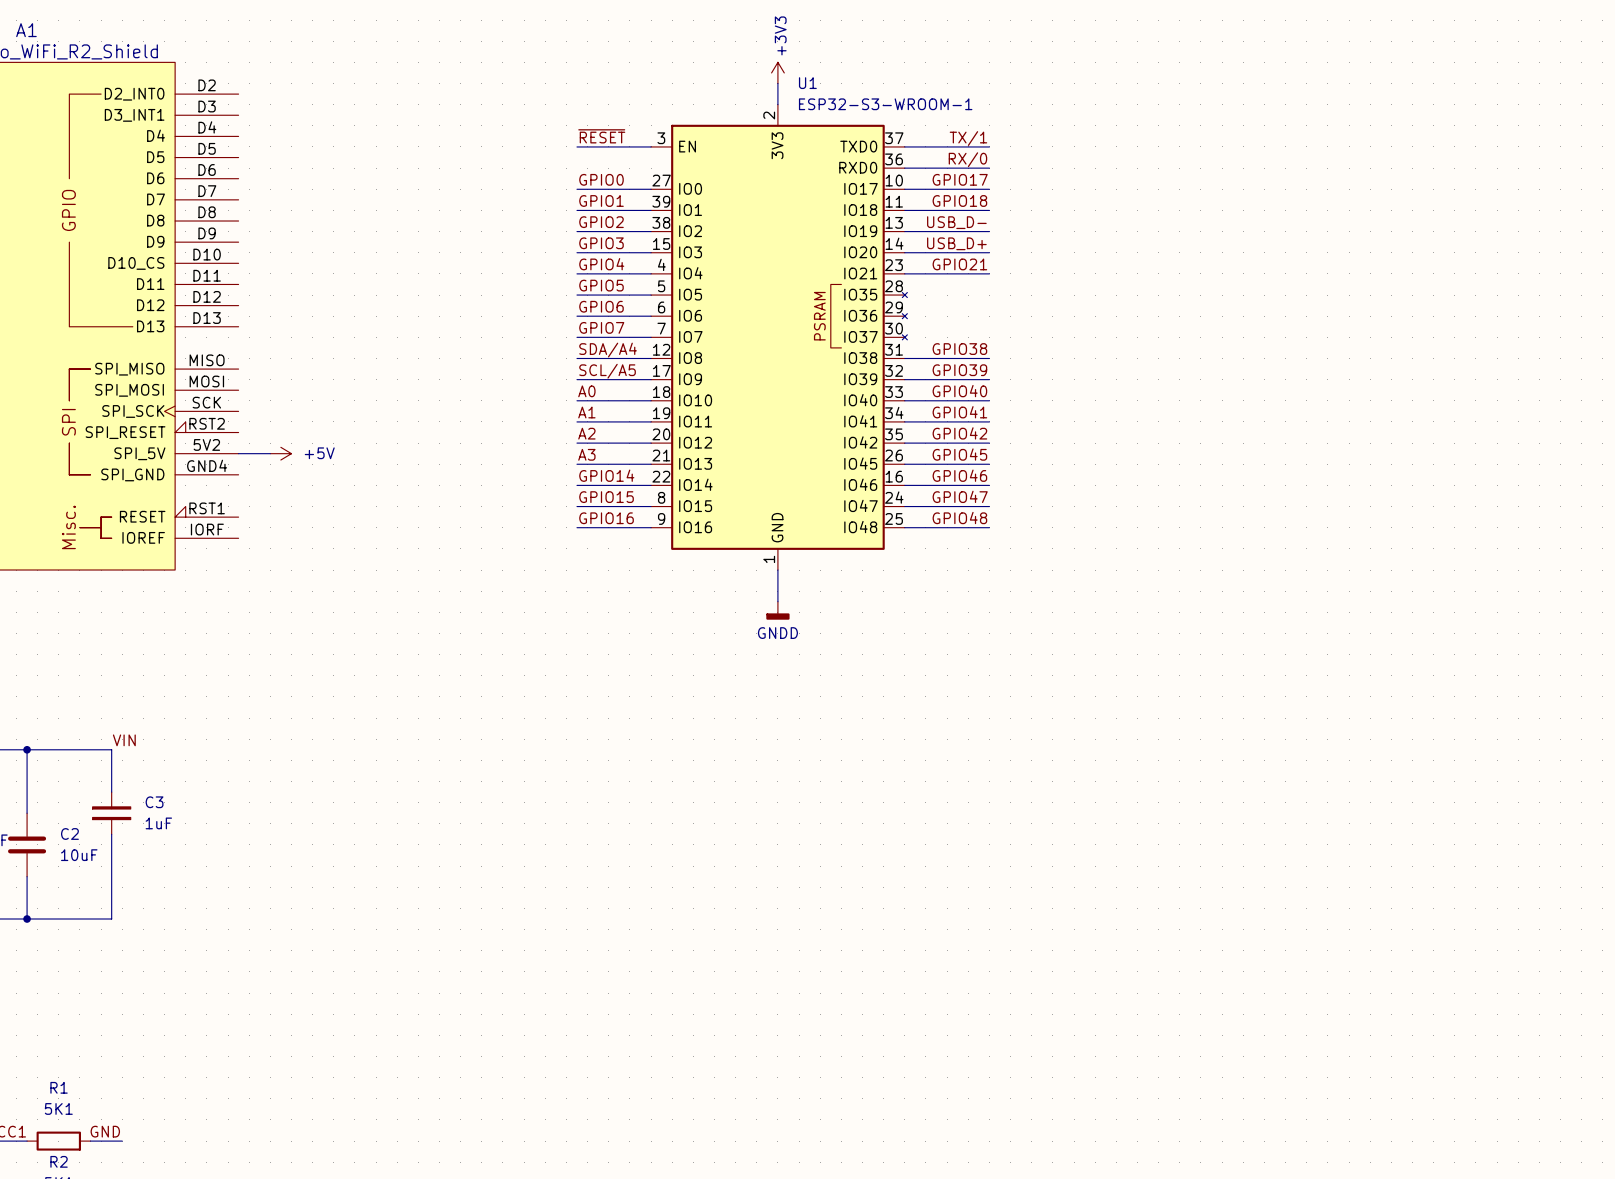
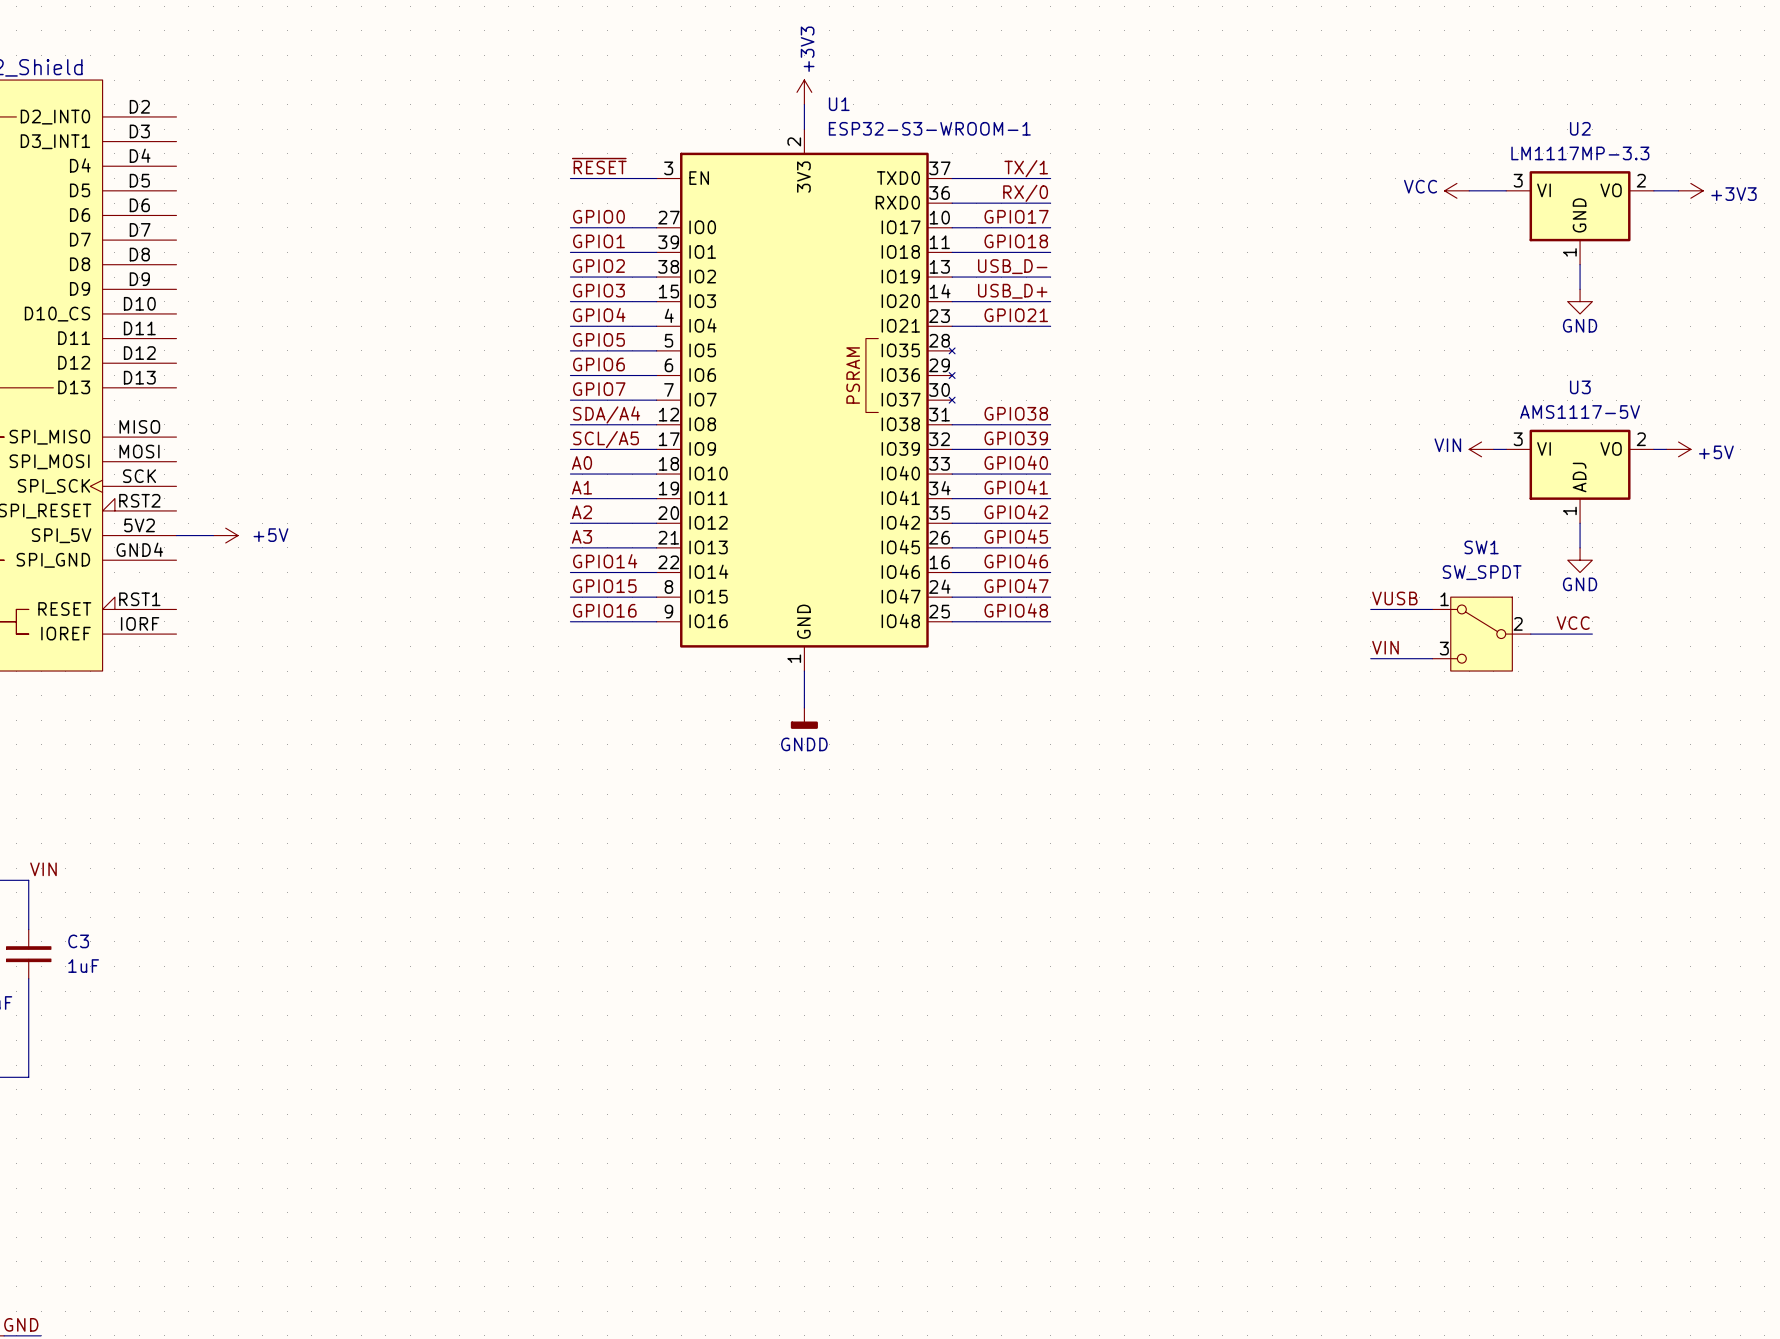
power symbol: none -> VCC (1456, 190)
wire: none -> (1469, 190) (1506, 190)
wire: none -> (1653, 190) (1678, 190)
power symbol: none -> +3V3 (1690, 190)
U2: none -> LM1117MP-3.3 (1580, 217)
wire: none -> (1580, 264) (1580, 289)
power symbol: none -> GND (1580, 301)
power symbol: none -> VIN (1481, 449)
wire: none -> (1493, 449) (1506, 449)
wire: none -> (1653, 449) (1666, 449)
power symbol: none -> +5V (1678, 449)
U3: none -> AMS1117-5V (1580, 476)
wire: none -> (1580, 523) (1580, 547)
power symbol: none -> GND (1580, 560)
label: none -> VUSB (1394, 598)
wire: none -> (1370, 609) (1432, 609)
label: none -> VCC (1573, 623)
SW1: none -> SW_SPDT (1481, 634)
wire: none -> (1530, 634) (1592, 634)
label: none -> VIN (1385, 647)
wire: none -> (1370, 658) (1432, 658)

